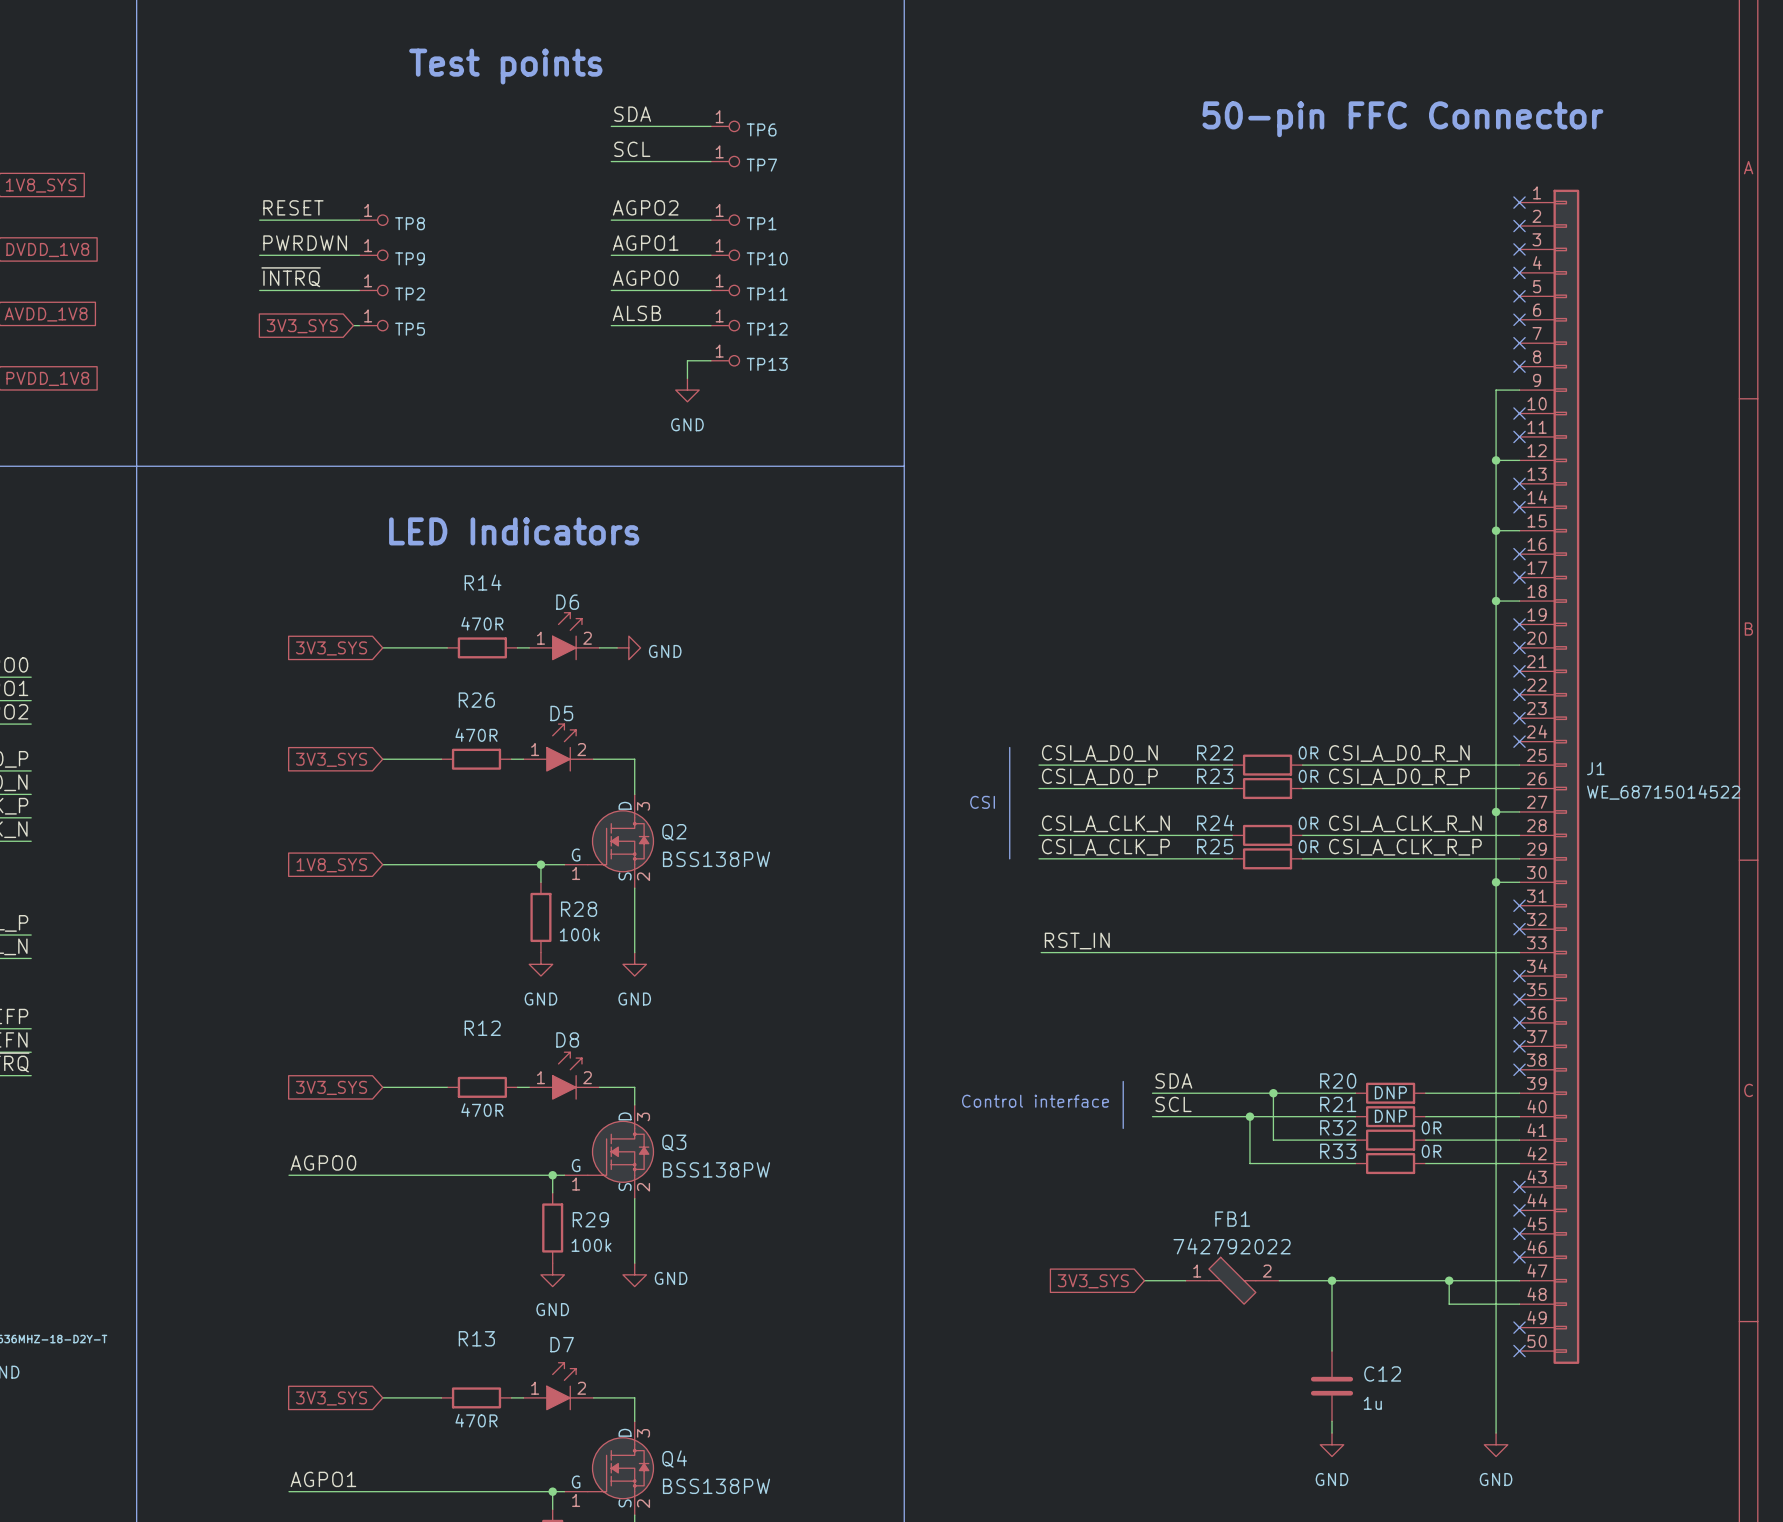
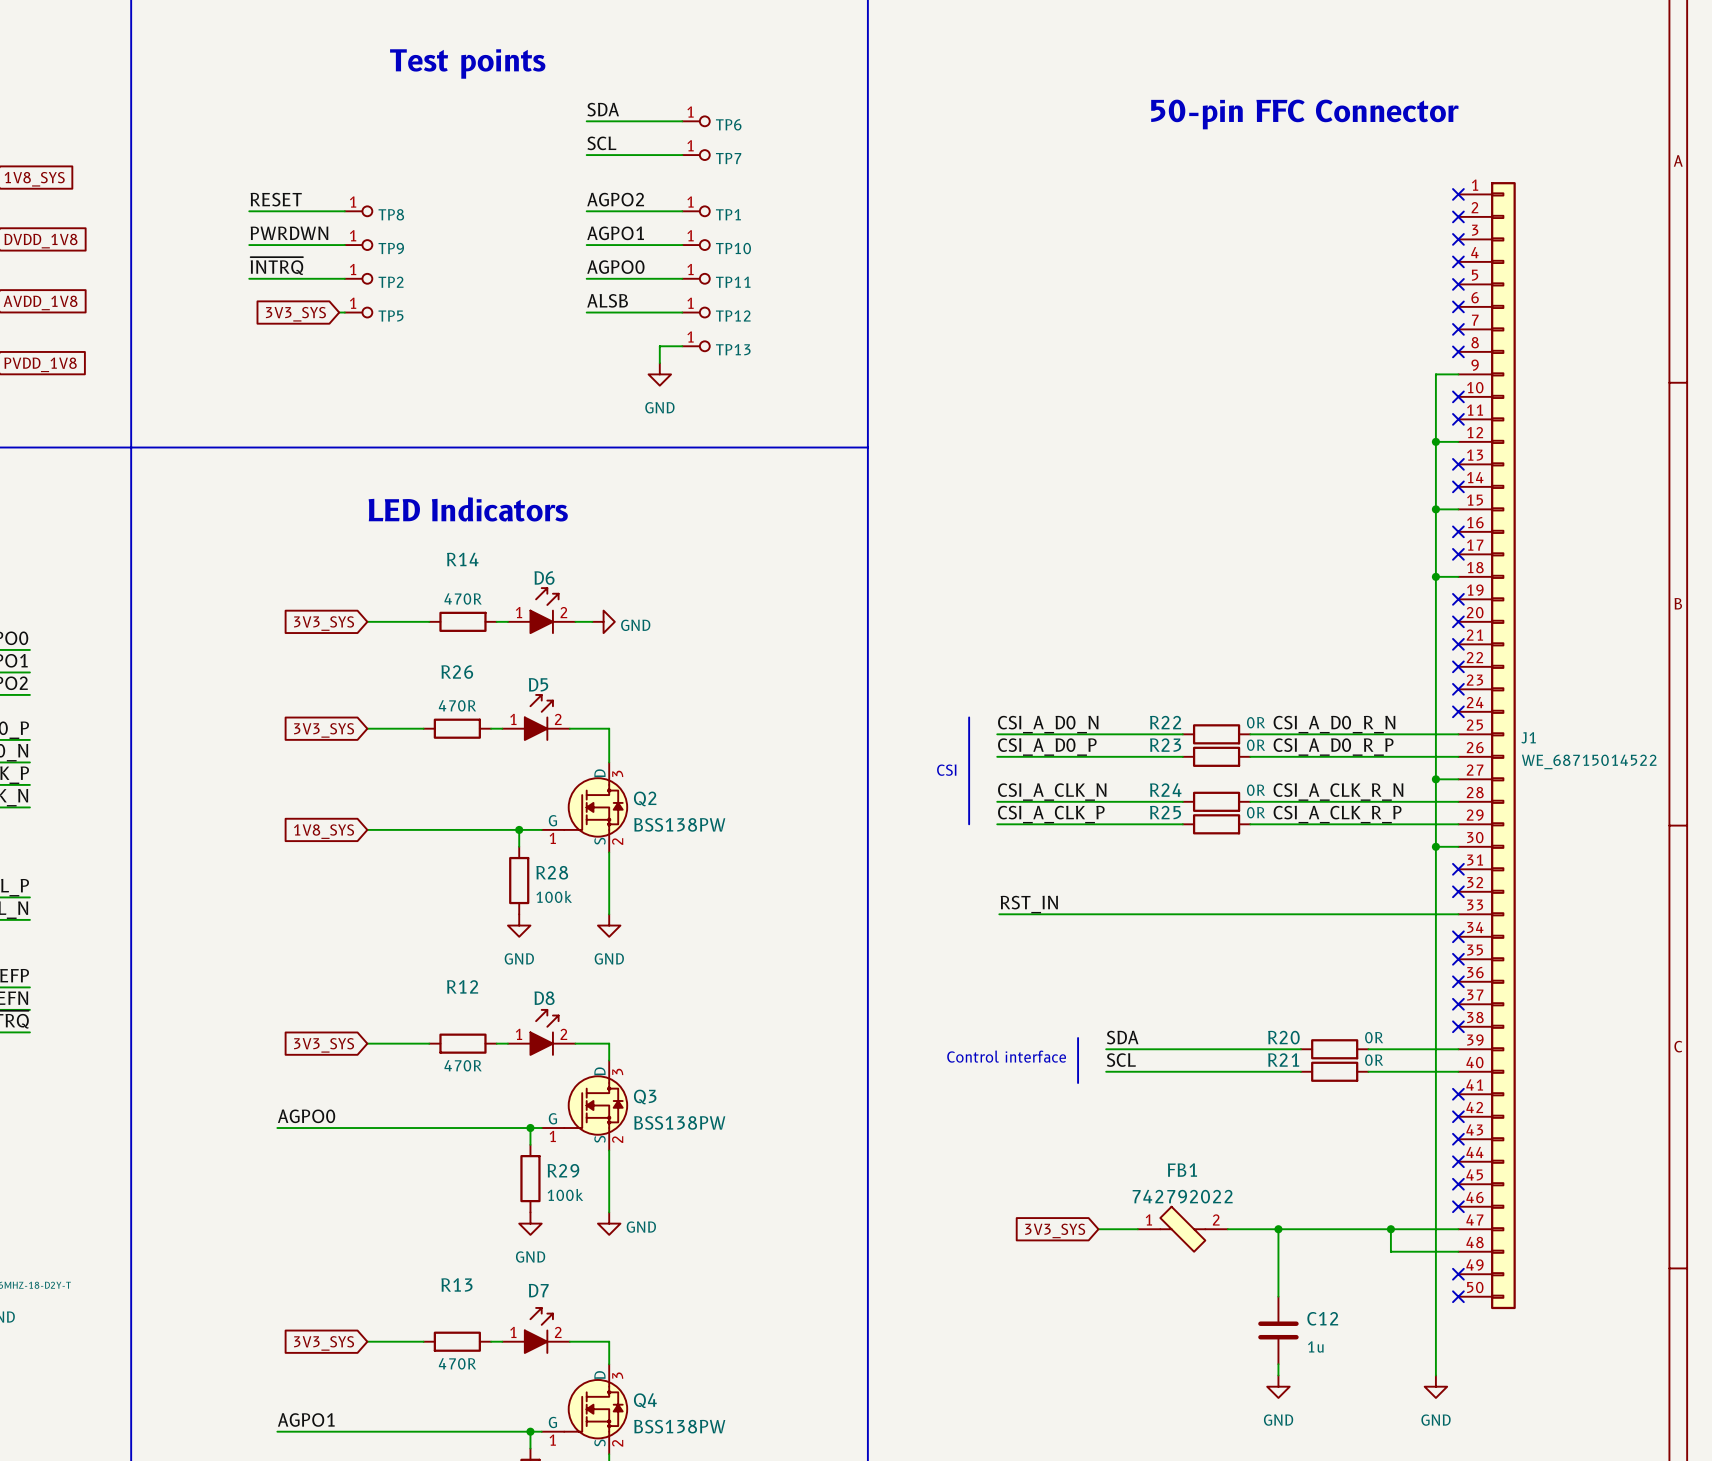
R20 text: none -> 0R (1374, 1037)
R20 text: DNP (1390, 1092) -> none
wire: (1273, 1093) (1273, 1140) (1355, 1140) -> none
junction: (1273, 1093) -> none
R21 text: none -> 0R (1374, 1060)
wire: (1249, 1116) (1249, 1163) (1355, 1163) -> none
junction: (1249, 1116) -> none
R21 text: DNP (1390, 1116) -> none
R32: (1390, 1140) -> none
wire: (1425, 1140) (1519, 1140) -> none
no-connect mark: none -> (1458, 1094)
R33: (1390, 1163) -> none
wire: (1425, 1163) (1519, 1163) -> none
no-connect mark: none -> (1458, 1116)

